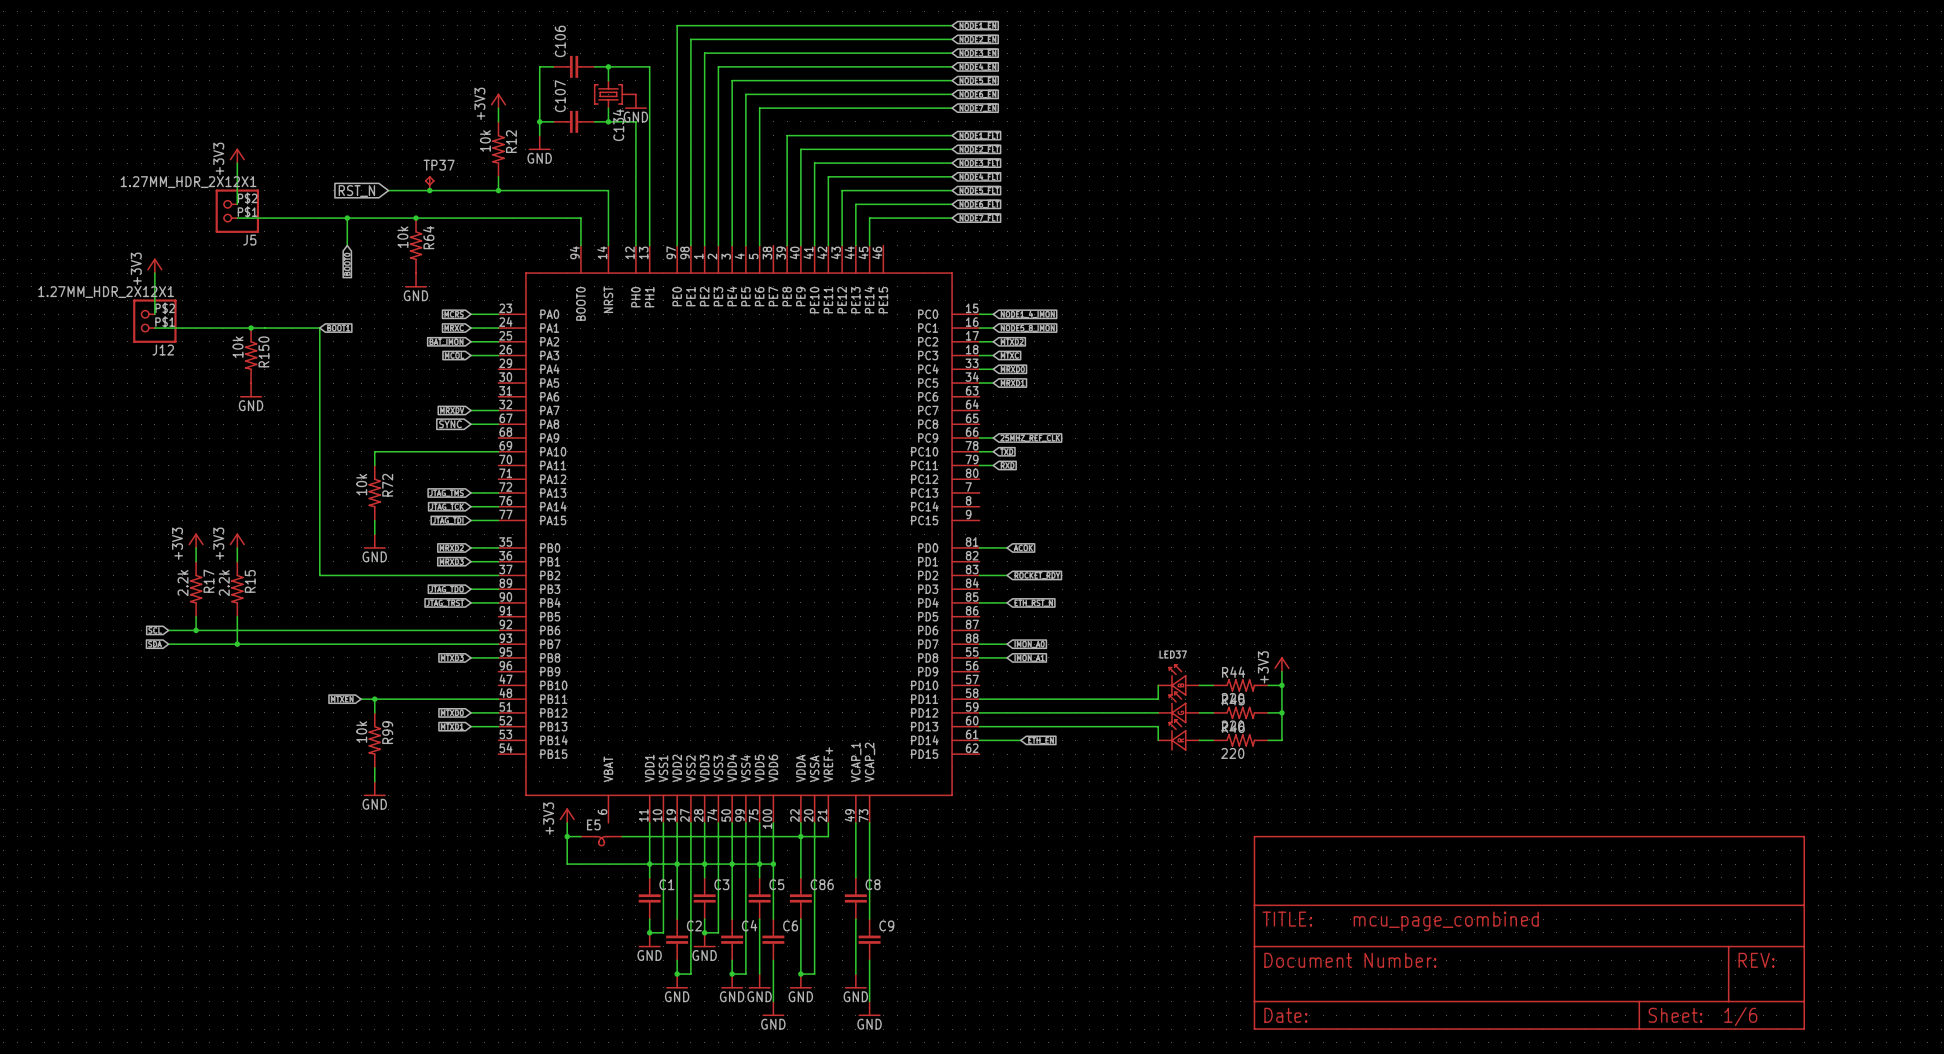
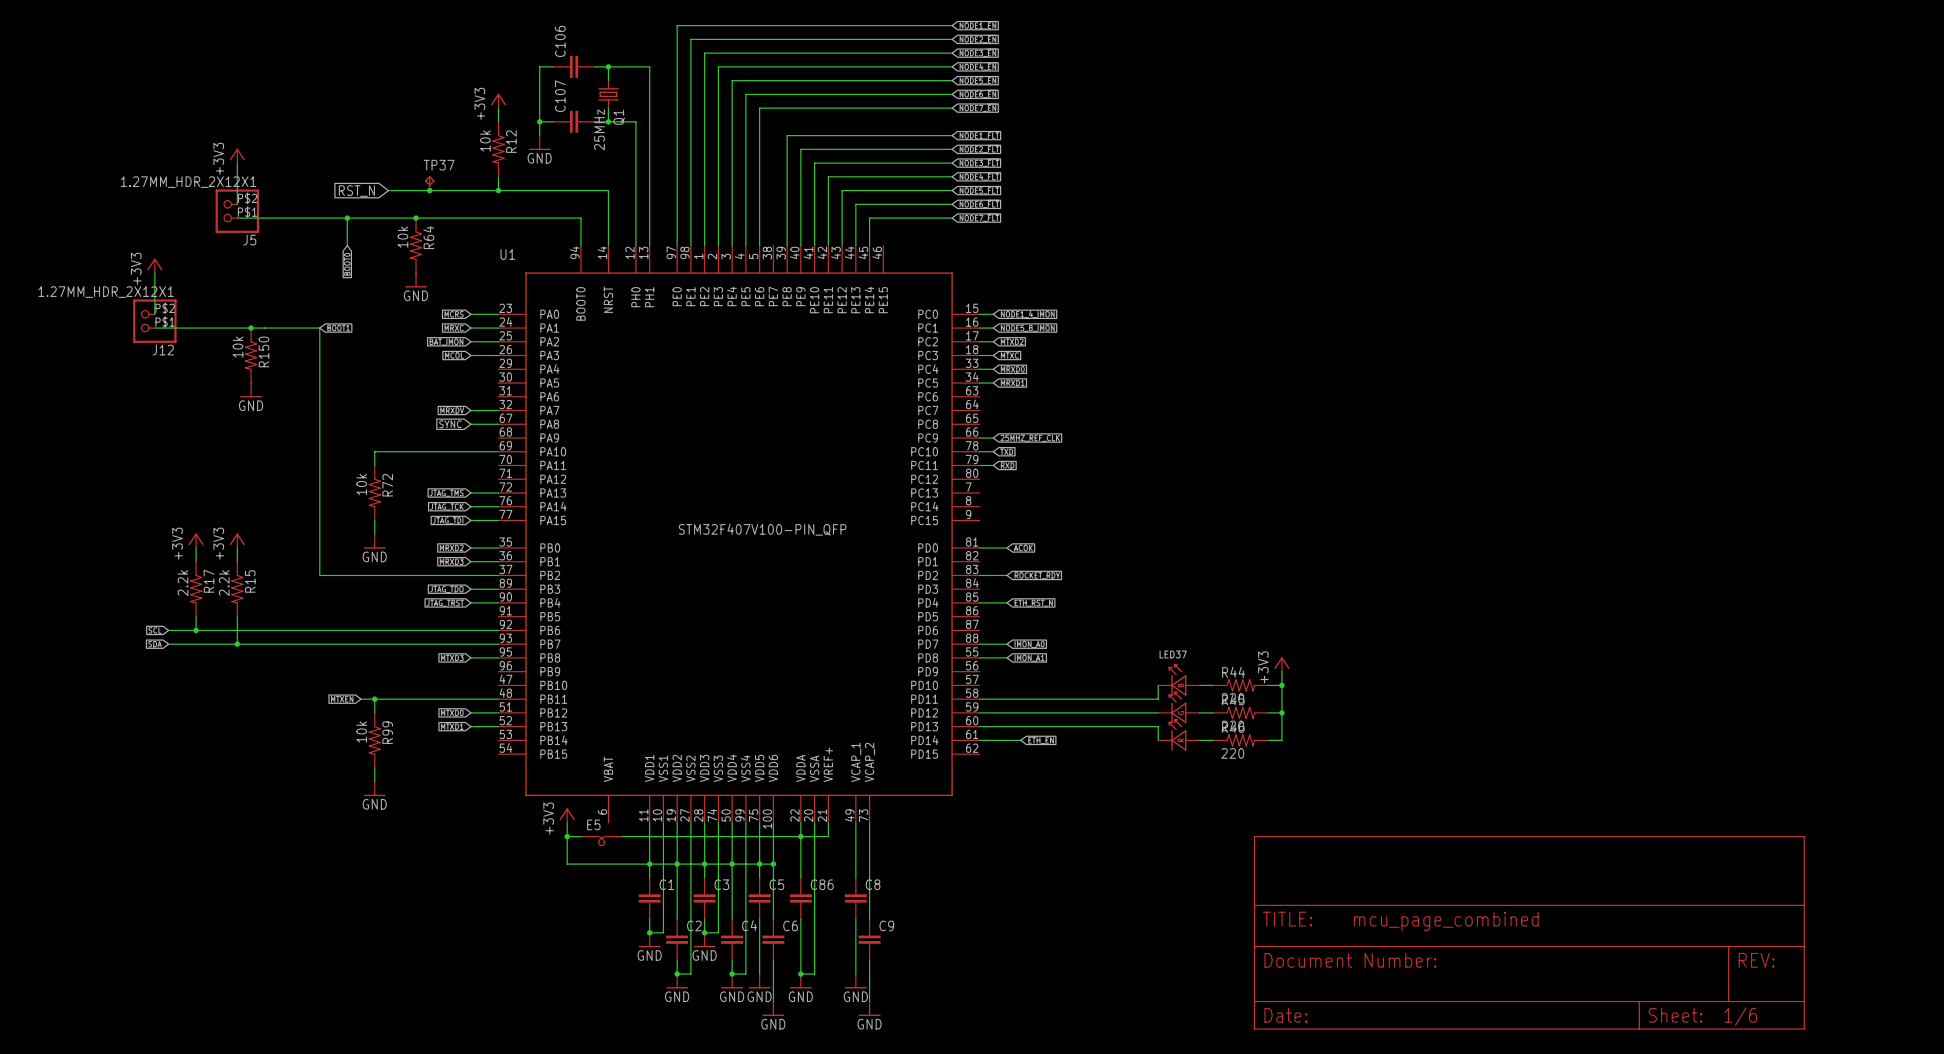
Q1: none -> 25MHz (608, 94)
C134: (615, 94) -> none
power symbol: GND (635, 101) -> none
U1 name: none -> U1 (507, 254)
U1 value: none -> STM32F407V100-PIN_QFP (762, 529)

